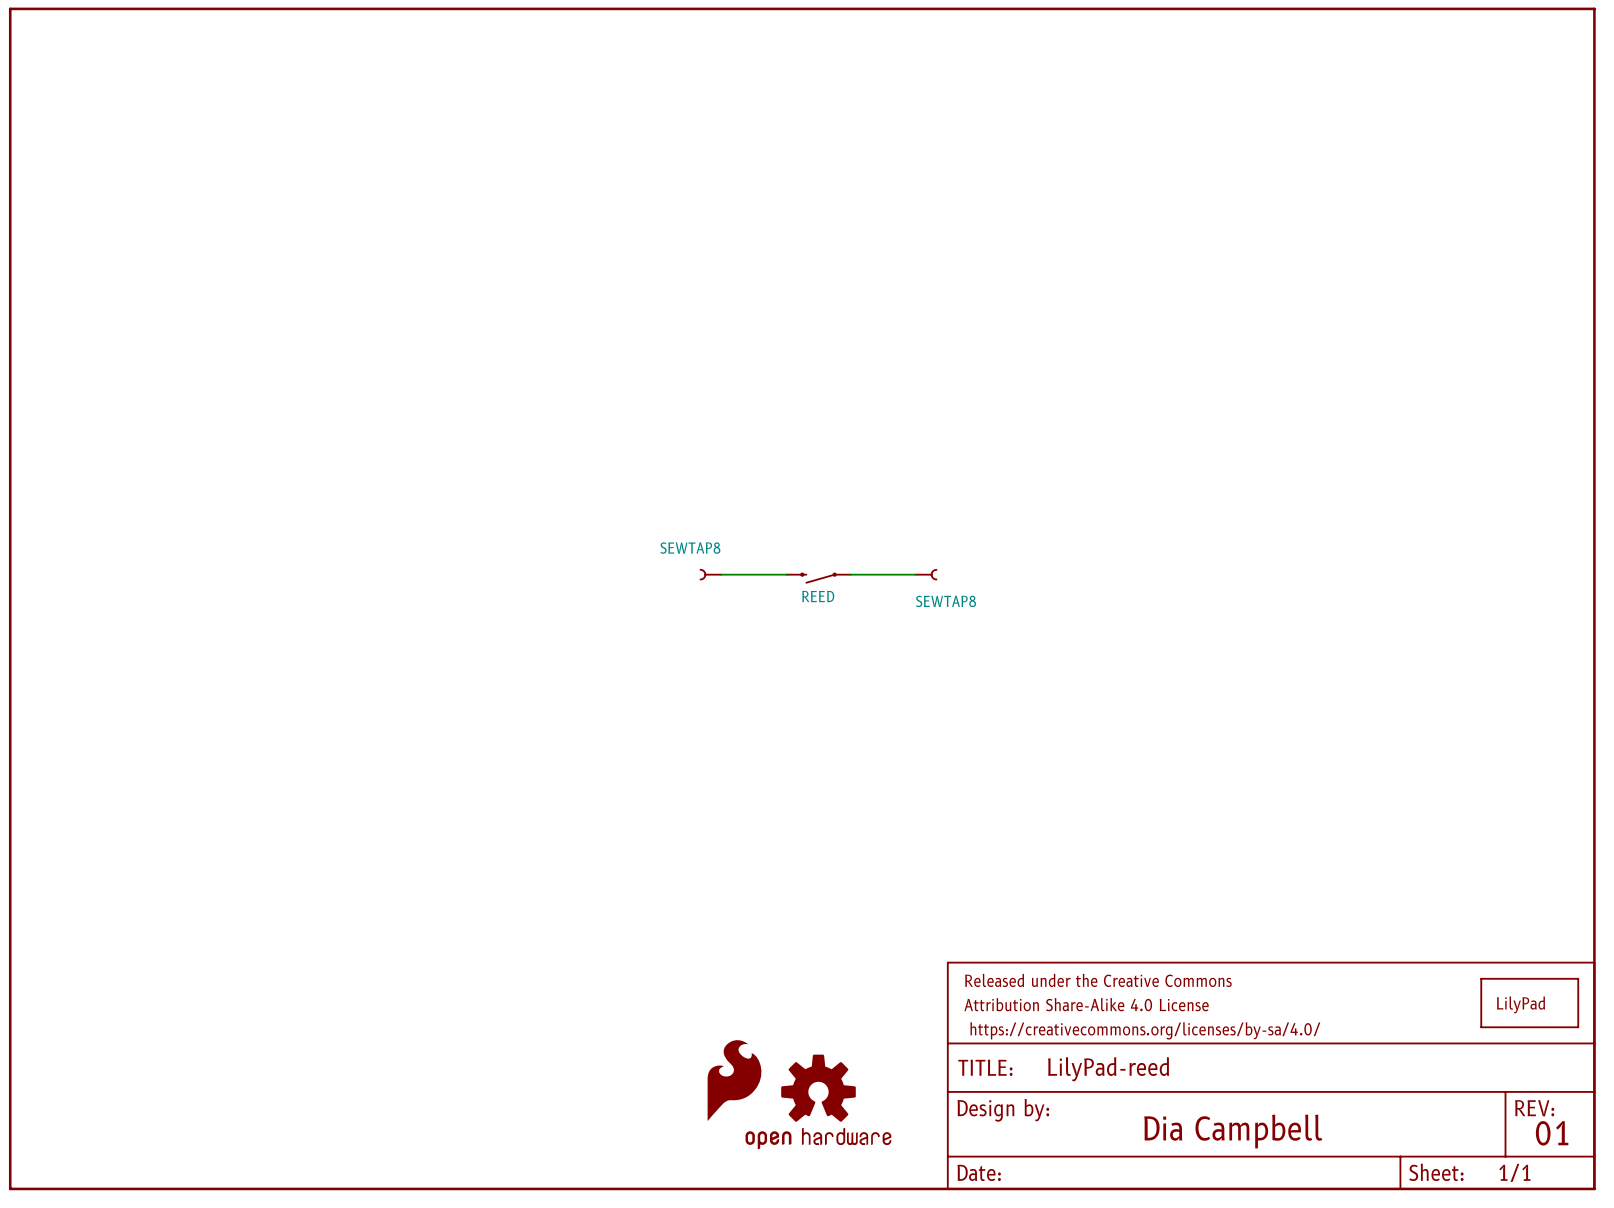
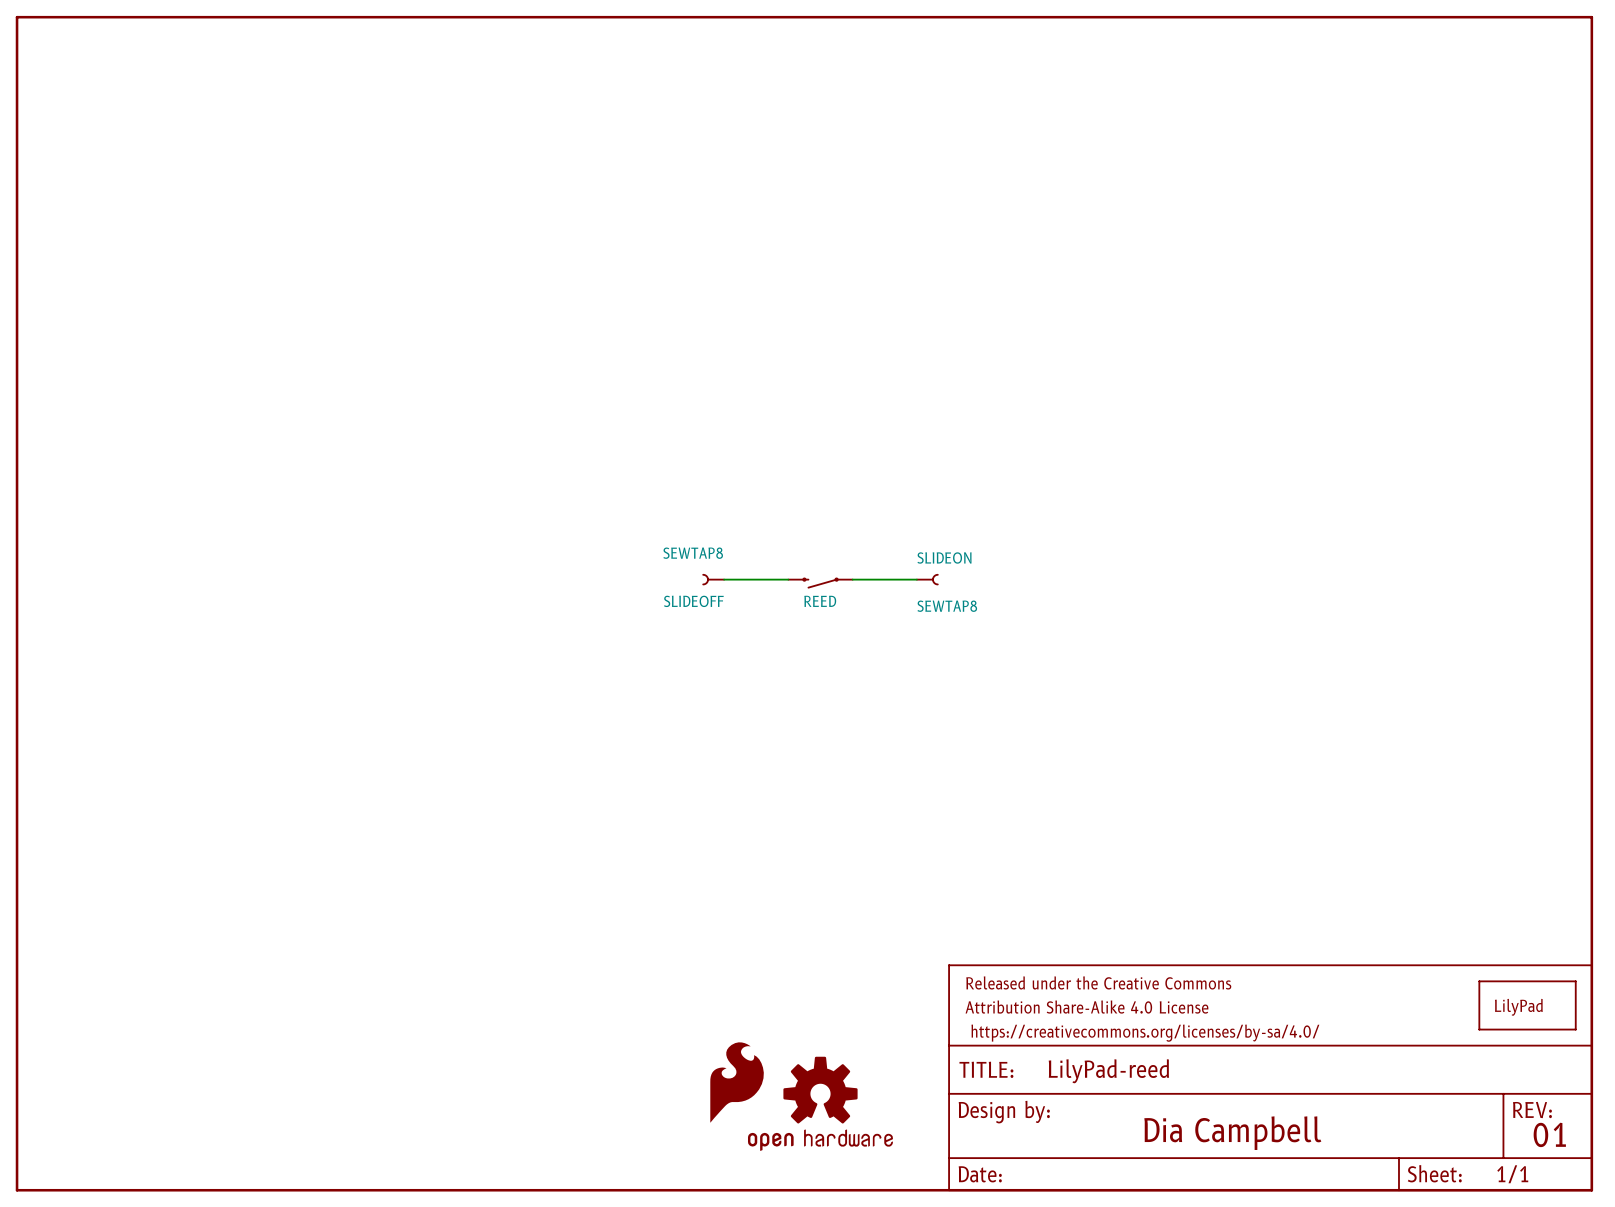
SLIDEON name: none -> SLIDEON (944, 557)
SLIDEOFF name: none -> SLIDEOFF (693, 601)

